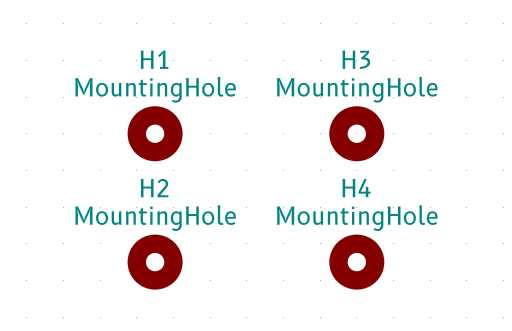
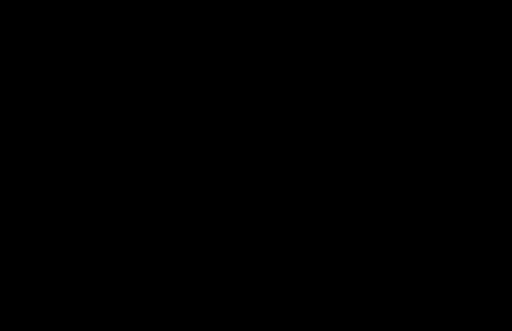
H1: MountingHole (155, 133) -> none
H3: MountingHole (356, 133) -> none
H2: MountingHole (155, 262) -> none
H4: MountingHole (356, 262) -> none

